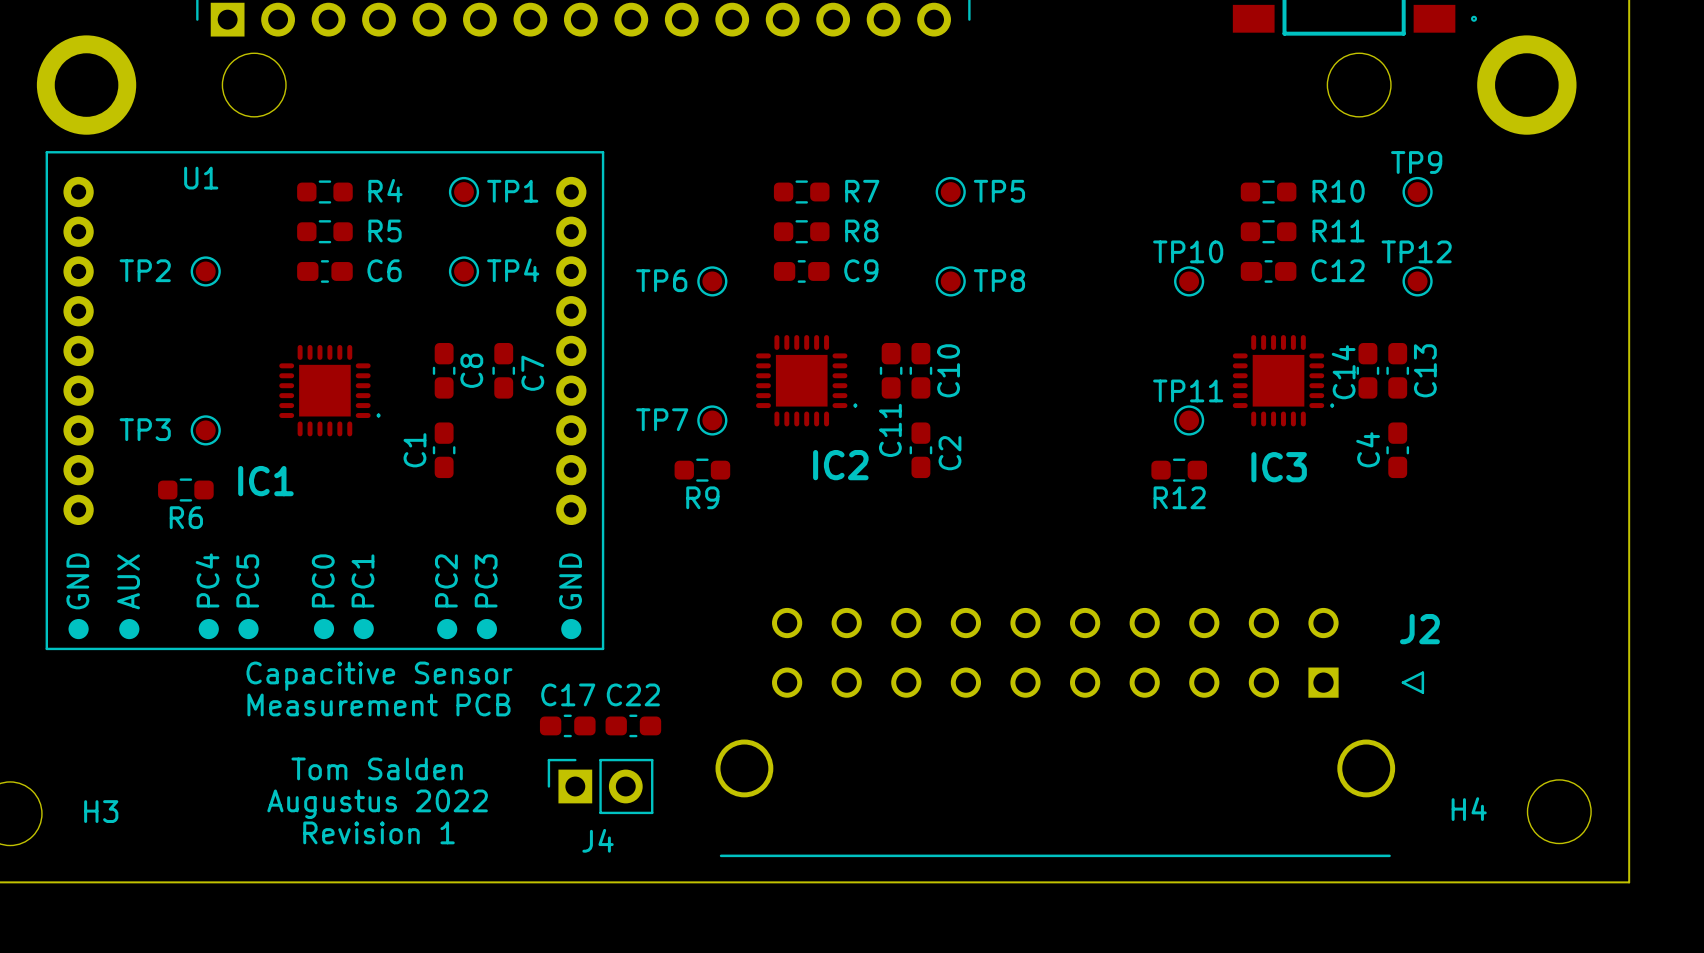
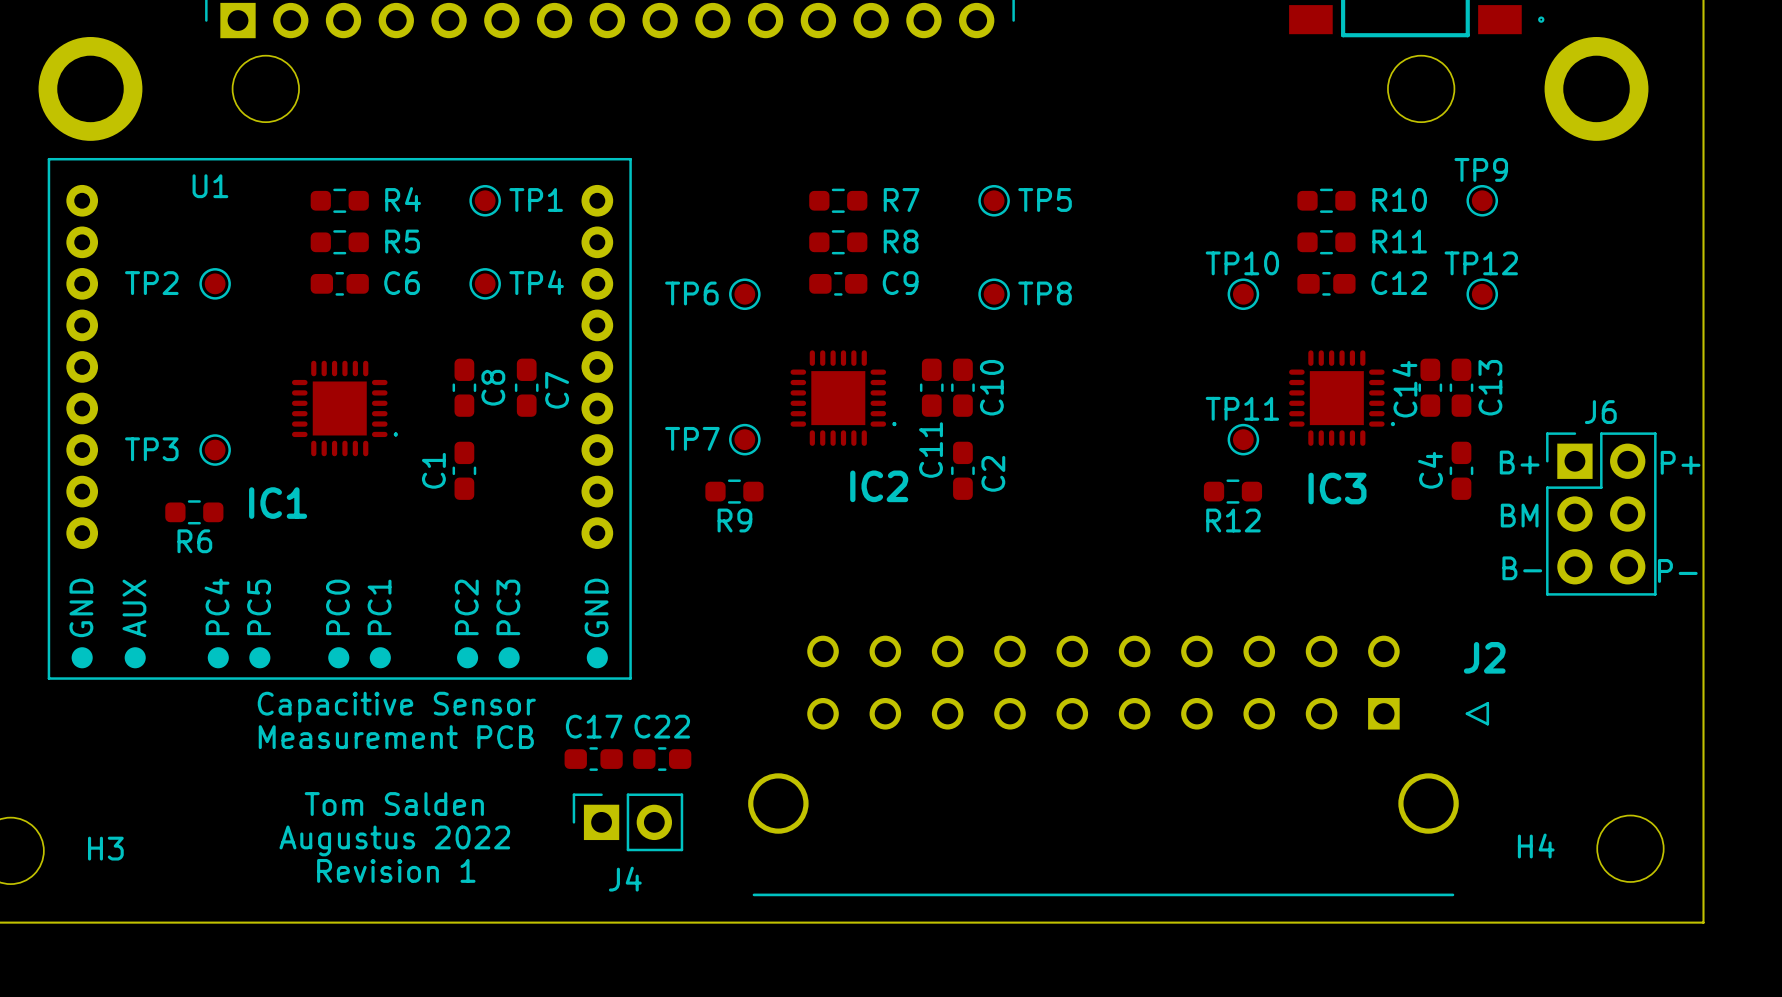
text: none -> B+ (1519, 462)
text: none -> P+ (1680, 462)
J6: none -> (1601, 514)
text: none -> BM (1519, 515)
text: none -> B- (1522, 568)
text: none -> P- (1677, 570)

